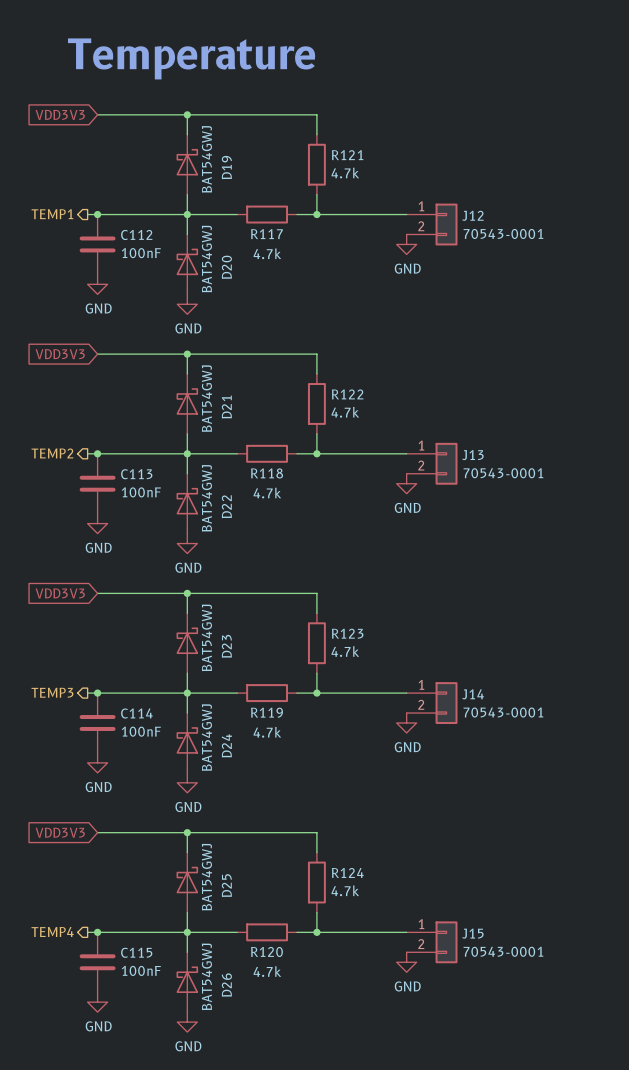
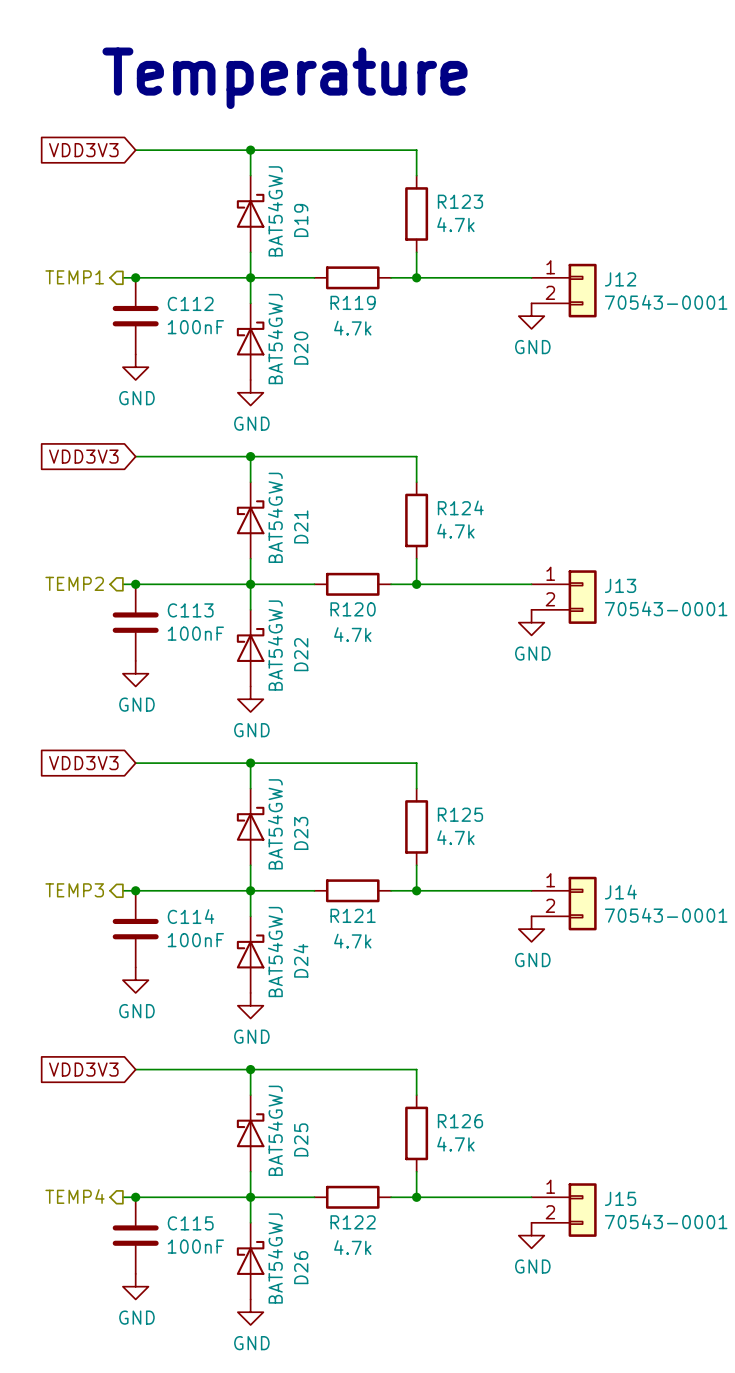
R121 name: R121 (347, 155) -> R123 (460, 201)
R117 name: R117 (266, 234) -> R119 (353, 302)
R122 name: R122 (347, 394) -> R124 (460, 507)
R118 name: R118 (267, 473) -> R120 (353, 609)
R123 name: R123 (347, 633) -> R125 (460, 814)
R119 name: R119 (267, 712) -> R121 (353, 915)
R124 name: R124 (347, 872) -> R126 (460, 1121)
R120 name: R120 (266, 951) -> R122 (353, 1222)

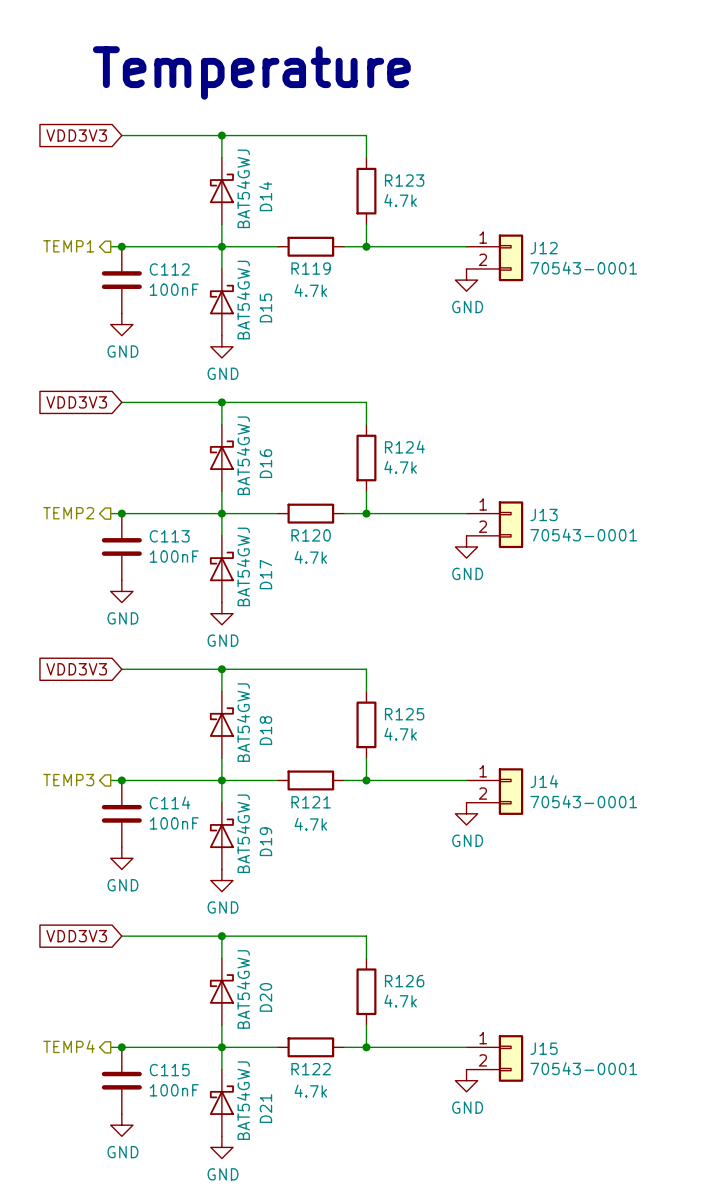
D19 name: D19 (301, 220) -> D14 (265, 196)
D20 name: D20 (301, 348) -> D15 (265, 307)
D21 name: D21 (301, 526) -> D16 (265, 463)
D22 name: D22 (301, 654) -> D17 (265, 574)
D23 name: D23 (301, 833) -> D18 (265, 730)
D24 name: D24 (300, 960) -> D19 (265, 841)
D25 name: D25 (301, 1139) -> D20 (265, 997)
D26 name: D26 (301, 1267) -> D21 (265, 1108)

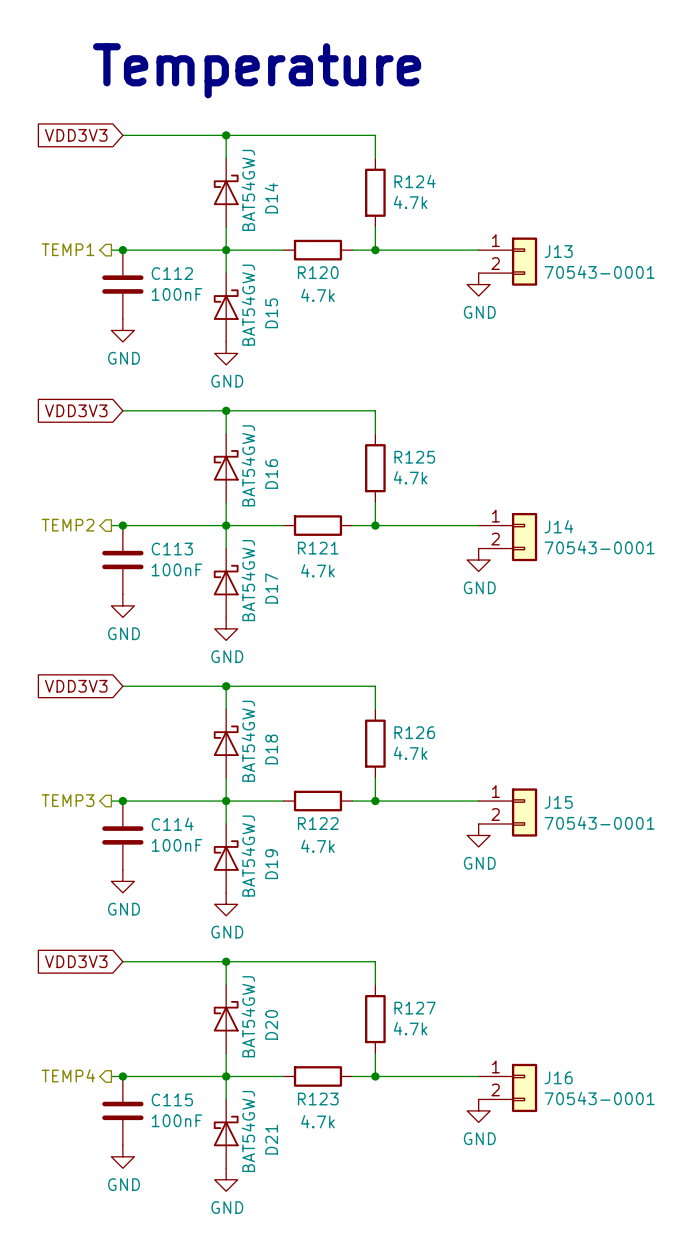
R123 name: R123 (404, 180) -> R124 (415, 181)
J12 name: J12 (544, 248) -> J13 (558, 251)
R119 name: R119 (311, 268) -> R120 (318, 272)
R124 name: R124 (404, 447) -> R125 (414, 457)
J13 name: J13 (544, 514) -> J14 (558, 526)
R120 name: R120 (311, 535) -> R121 (318, 548)
R125 name: R125 (404, 714) -> R126 (414, 732)
J14 name: J14 (544, 781) -> J15 (558, 802)
R121 name: R121 (311, 802) -> R122 (318, 823)
R126 name: R126 (404, 981) -> R127 (415, 1008)
J15 name: J15 (544, 1048) -> J16 (558, 1077)
R122 name: R122 (311, 1069) -> R123 (318, 1099)

